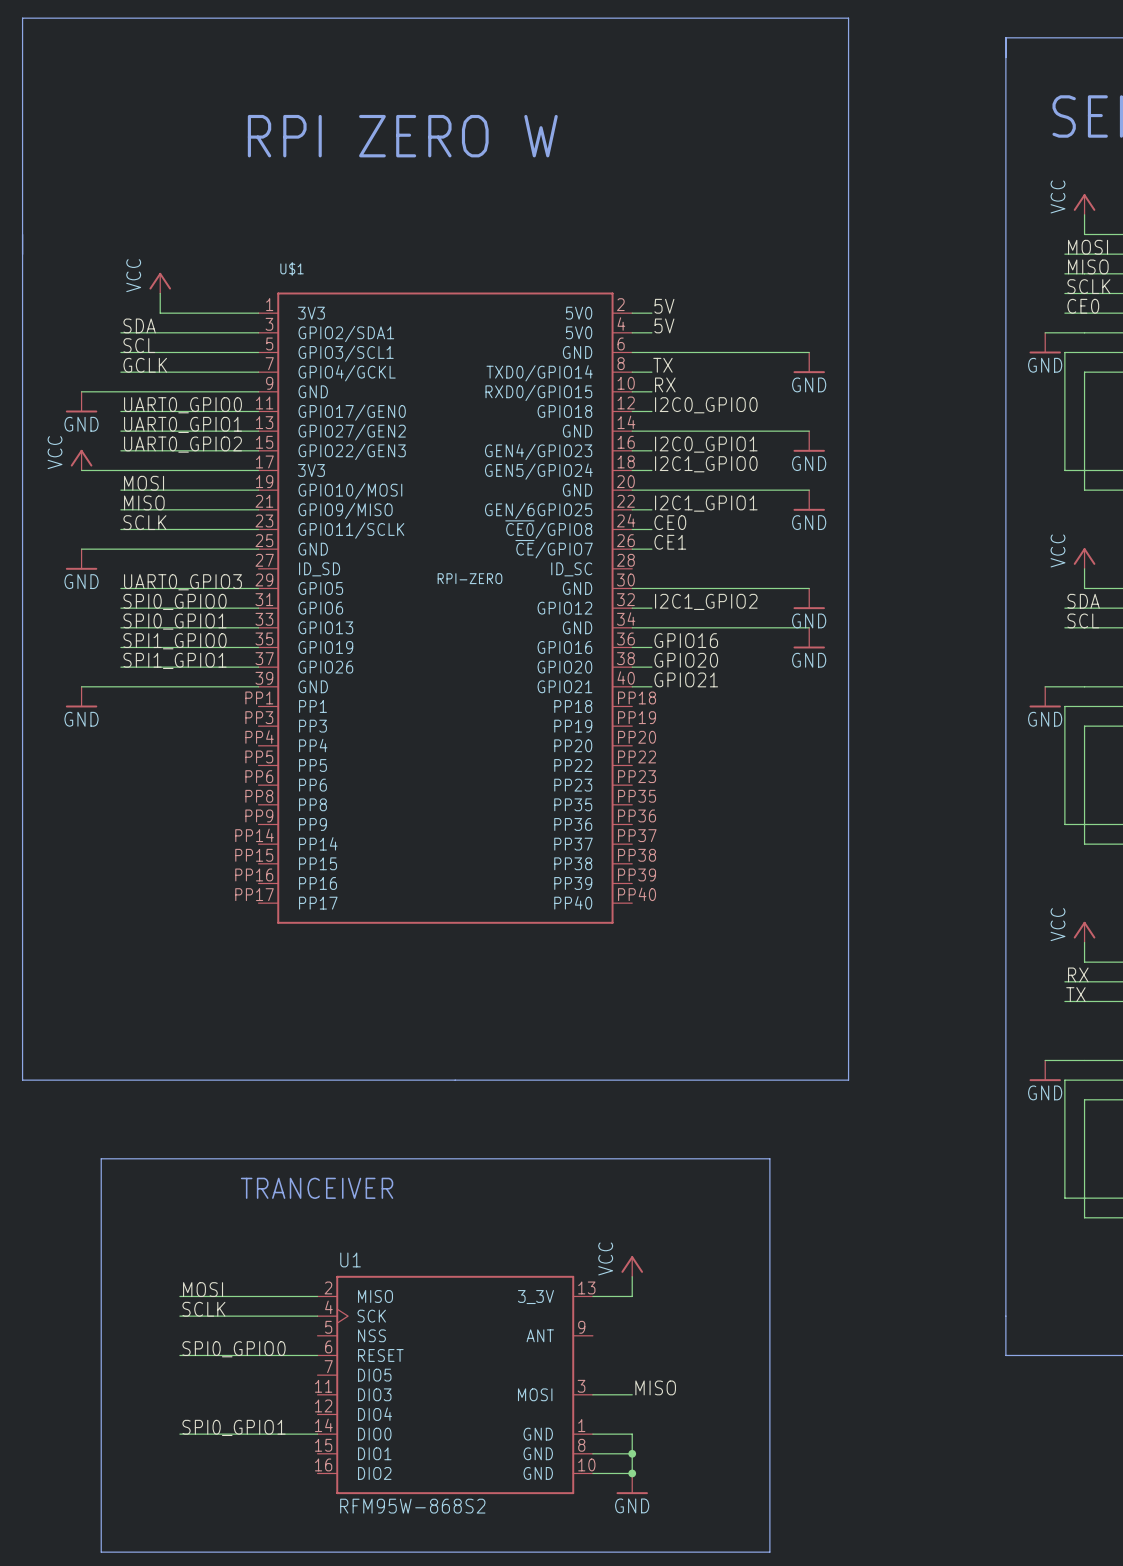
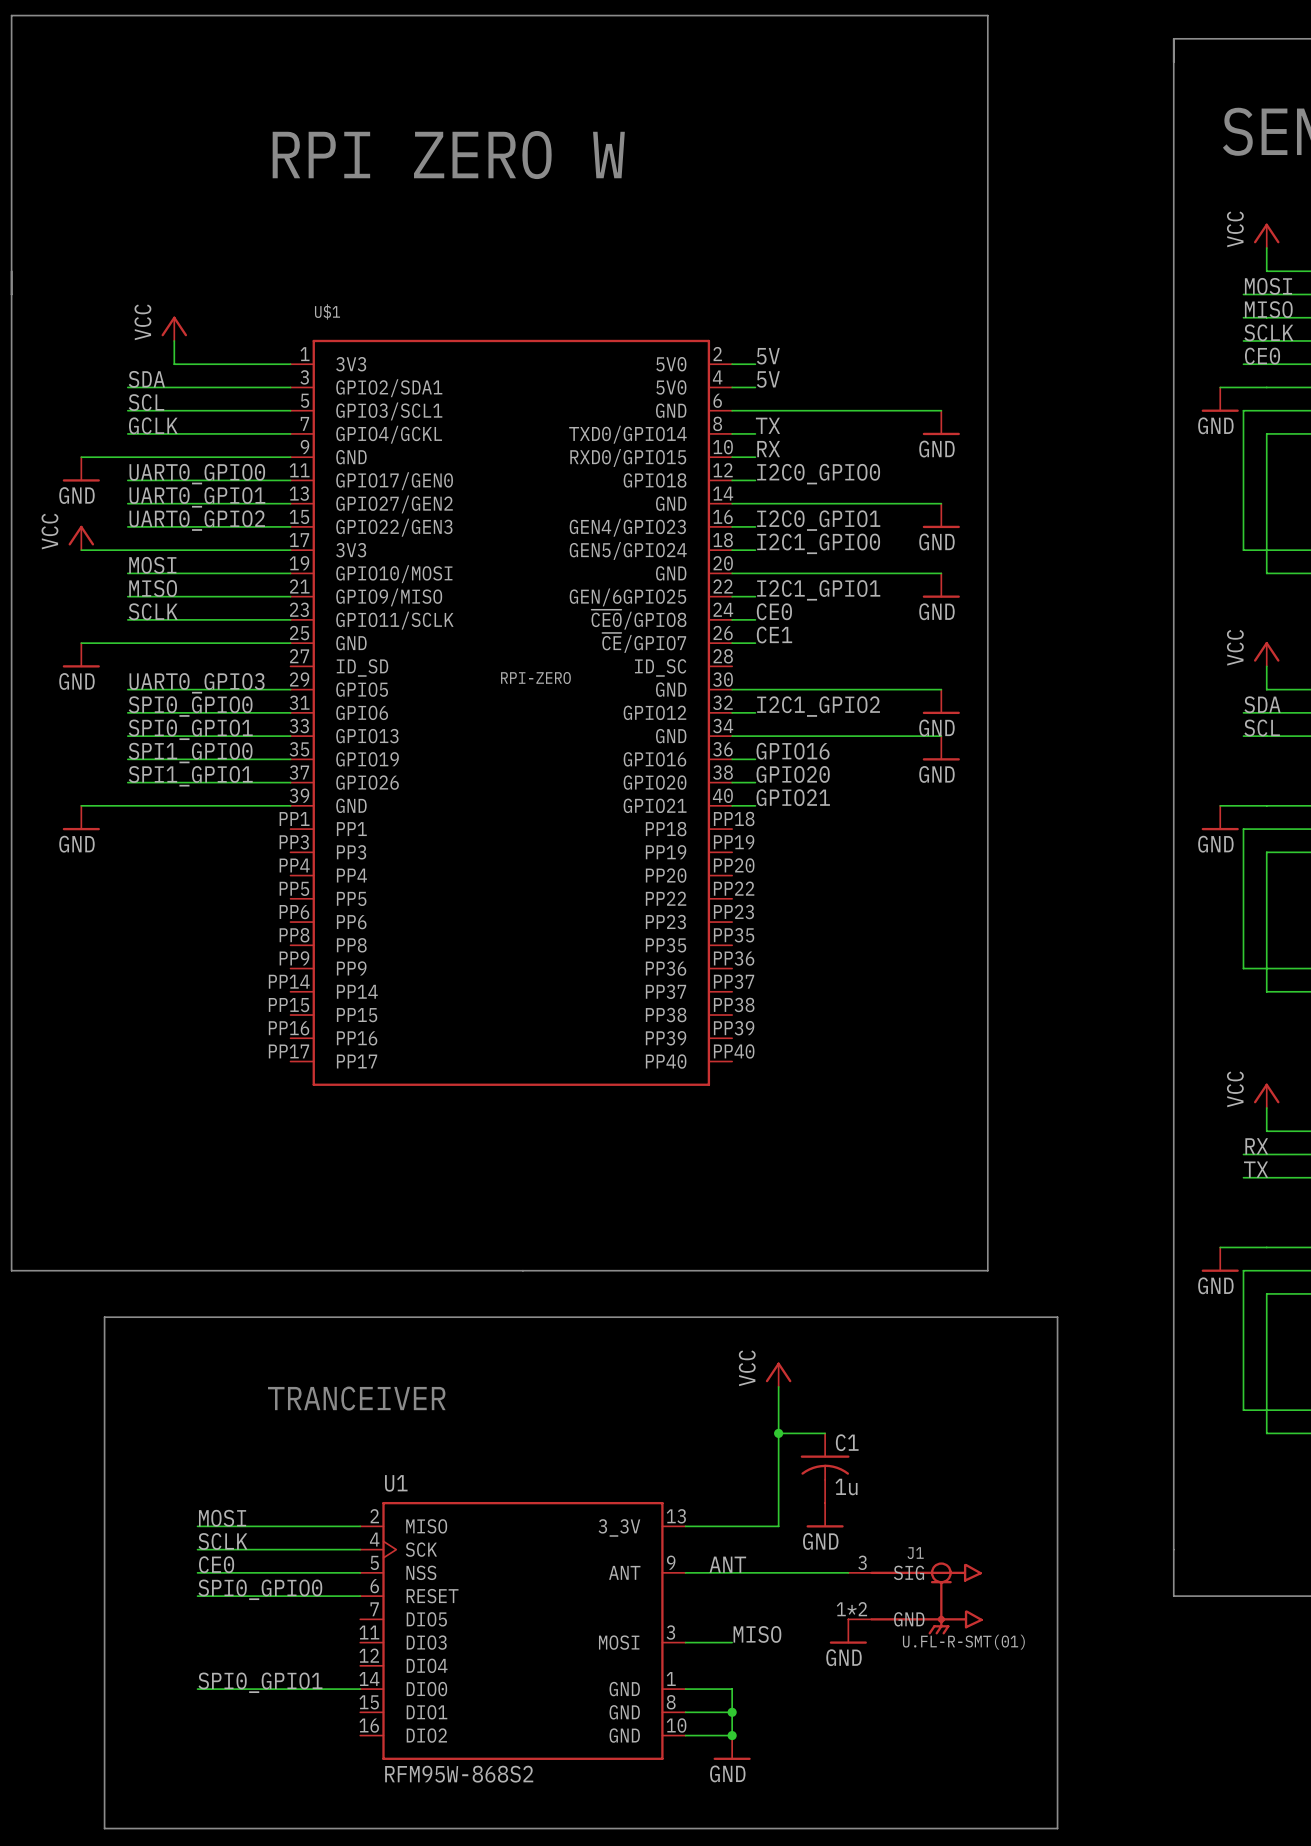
line: (101, 1158) (769, 1158) (769, 1552) -> (104, 1363) (104, 1317) (1057, 1317) (1057, 1828) (894, 1828)
wire: none -> (778, 1433) (825, 1433)
junction: none -> (778, 1433)
C1: none -> 1u (825, 1468)
power symbol position: VCC (632, 1266) -> VCC (778, 1374)
wire: (632, 1276) (632, 1296) -> (778, 1386) (778, 1526) (732, 1526)
power symbol: none -> GND (825, 1515)
label: none -> CE0 (216, 1564)
label: none -> ANT (727, 1564)
wire: none -> (197, 1572) (360, 1572)
wire: none -> (685, 1572) (848, 1572)
J1: none -> U.FL-R-SMT(01) (915, 1598)
power symbol: none -> GND (848, 1631)

